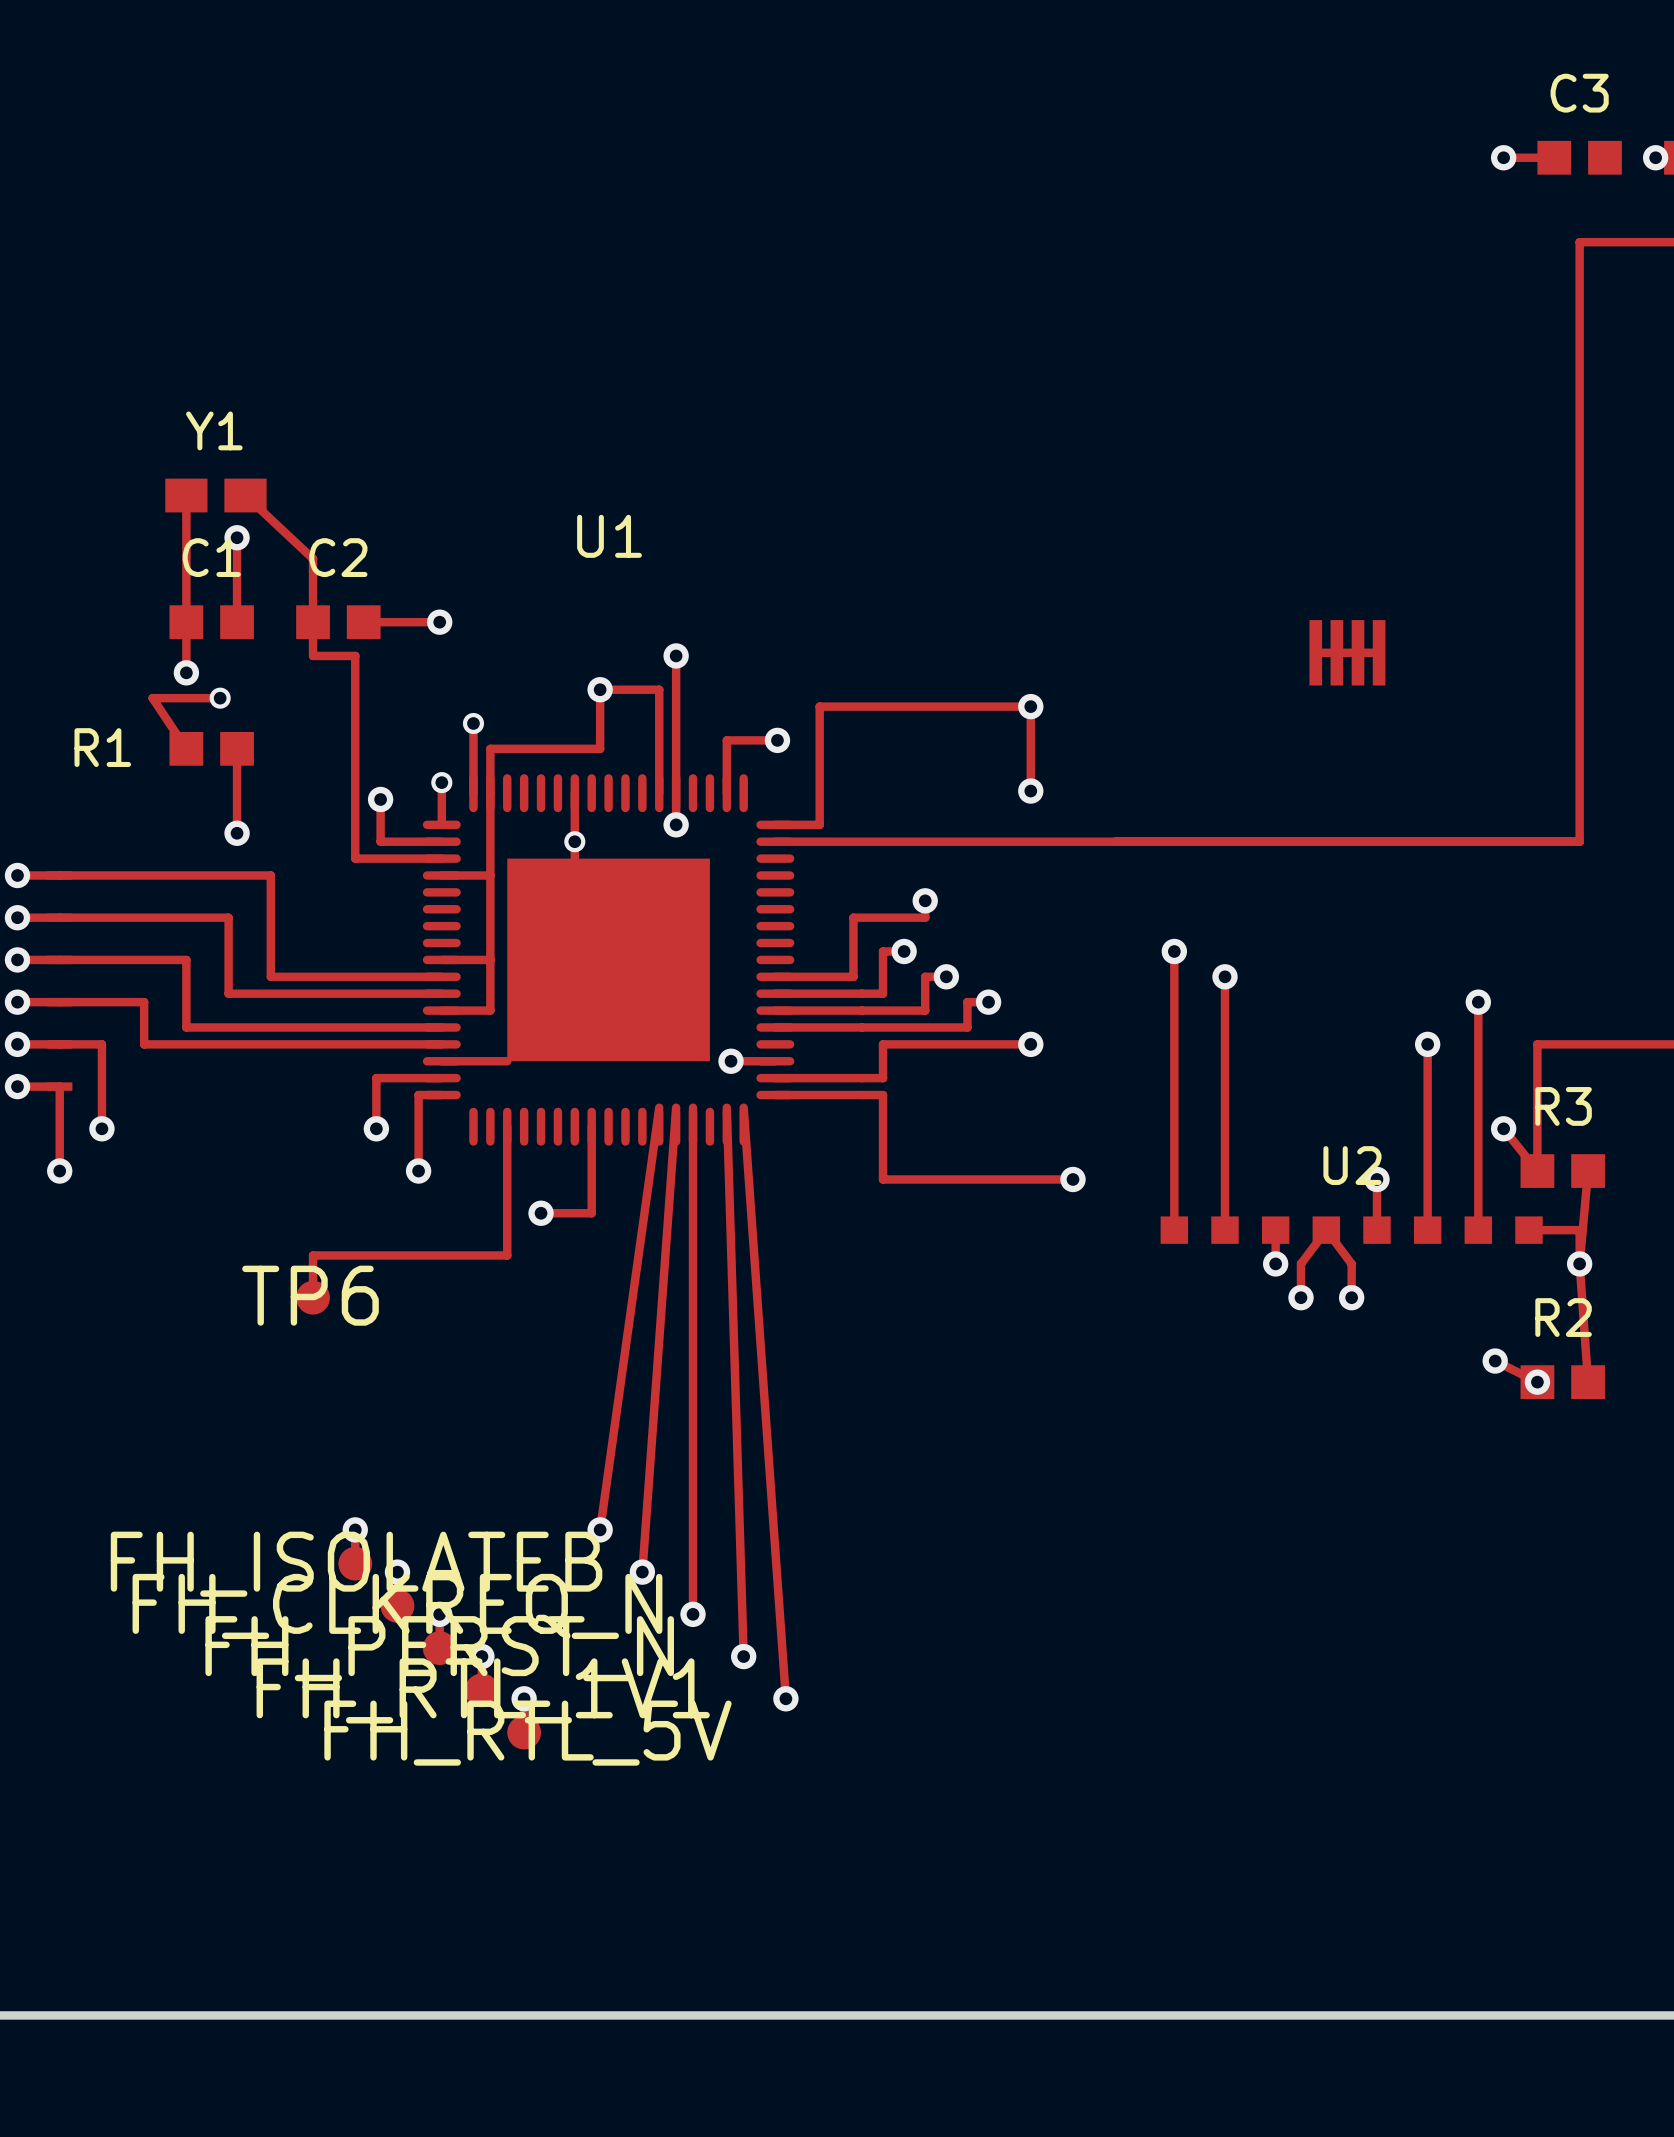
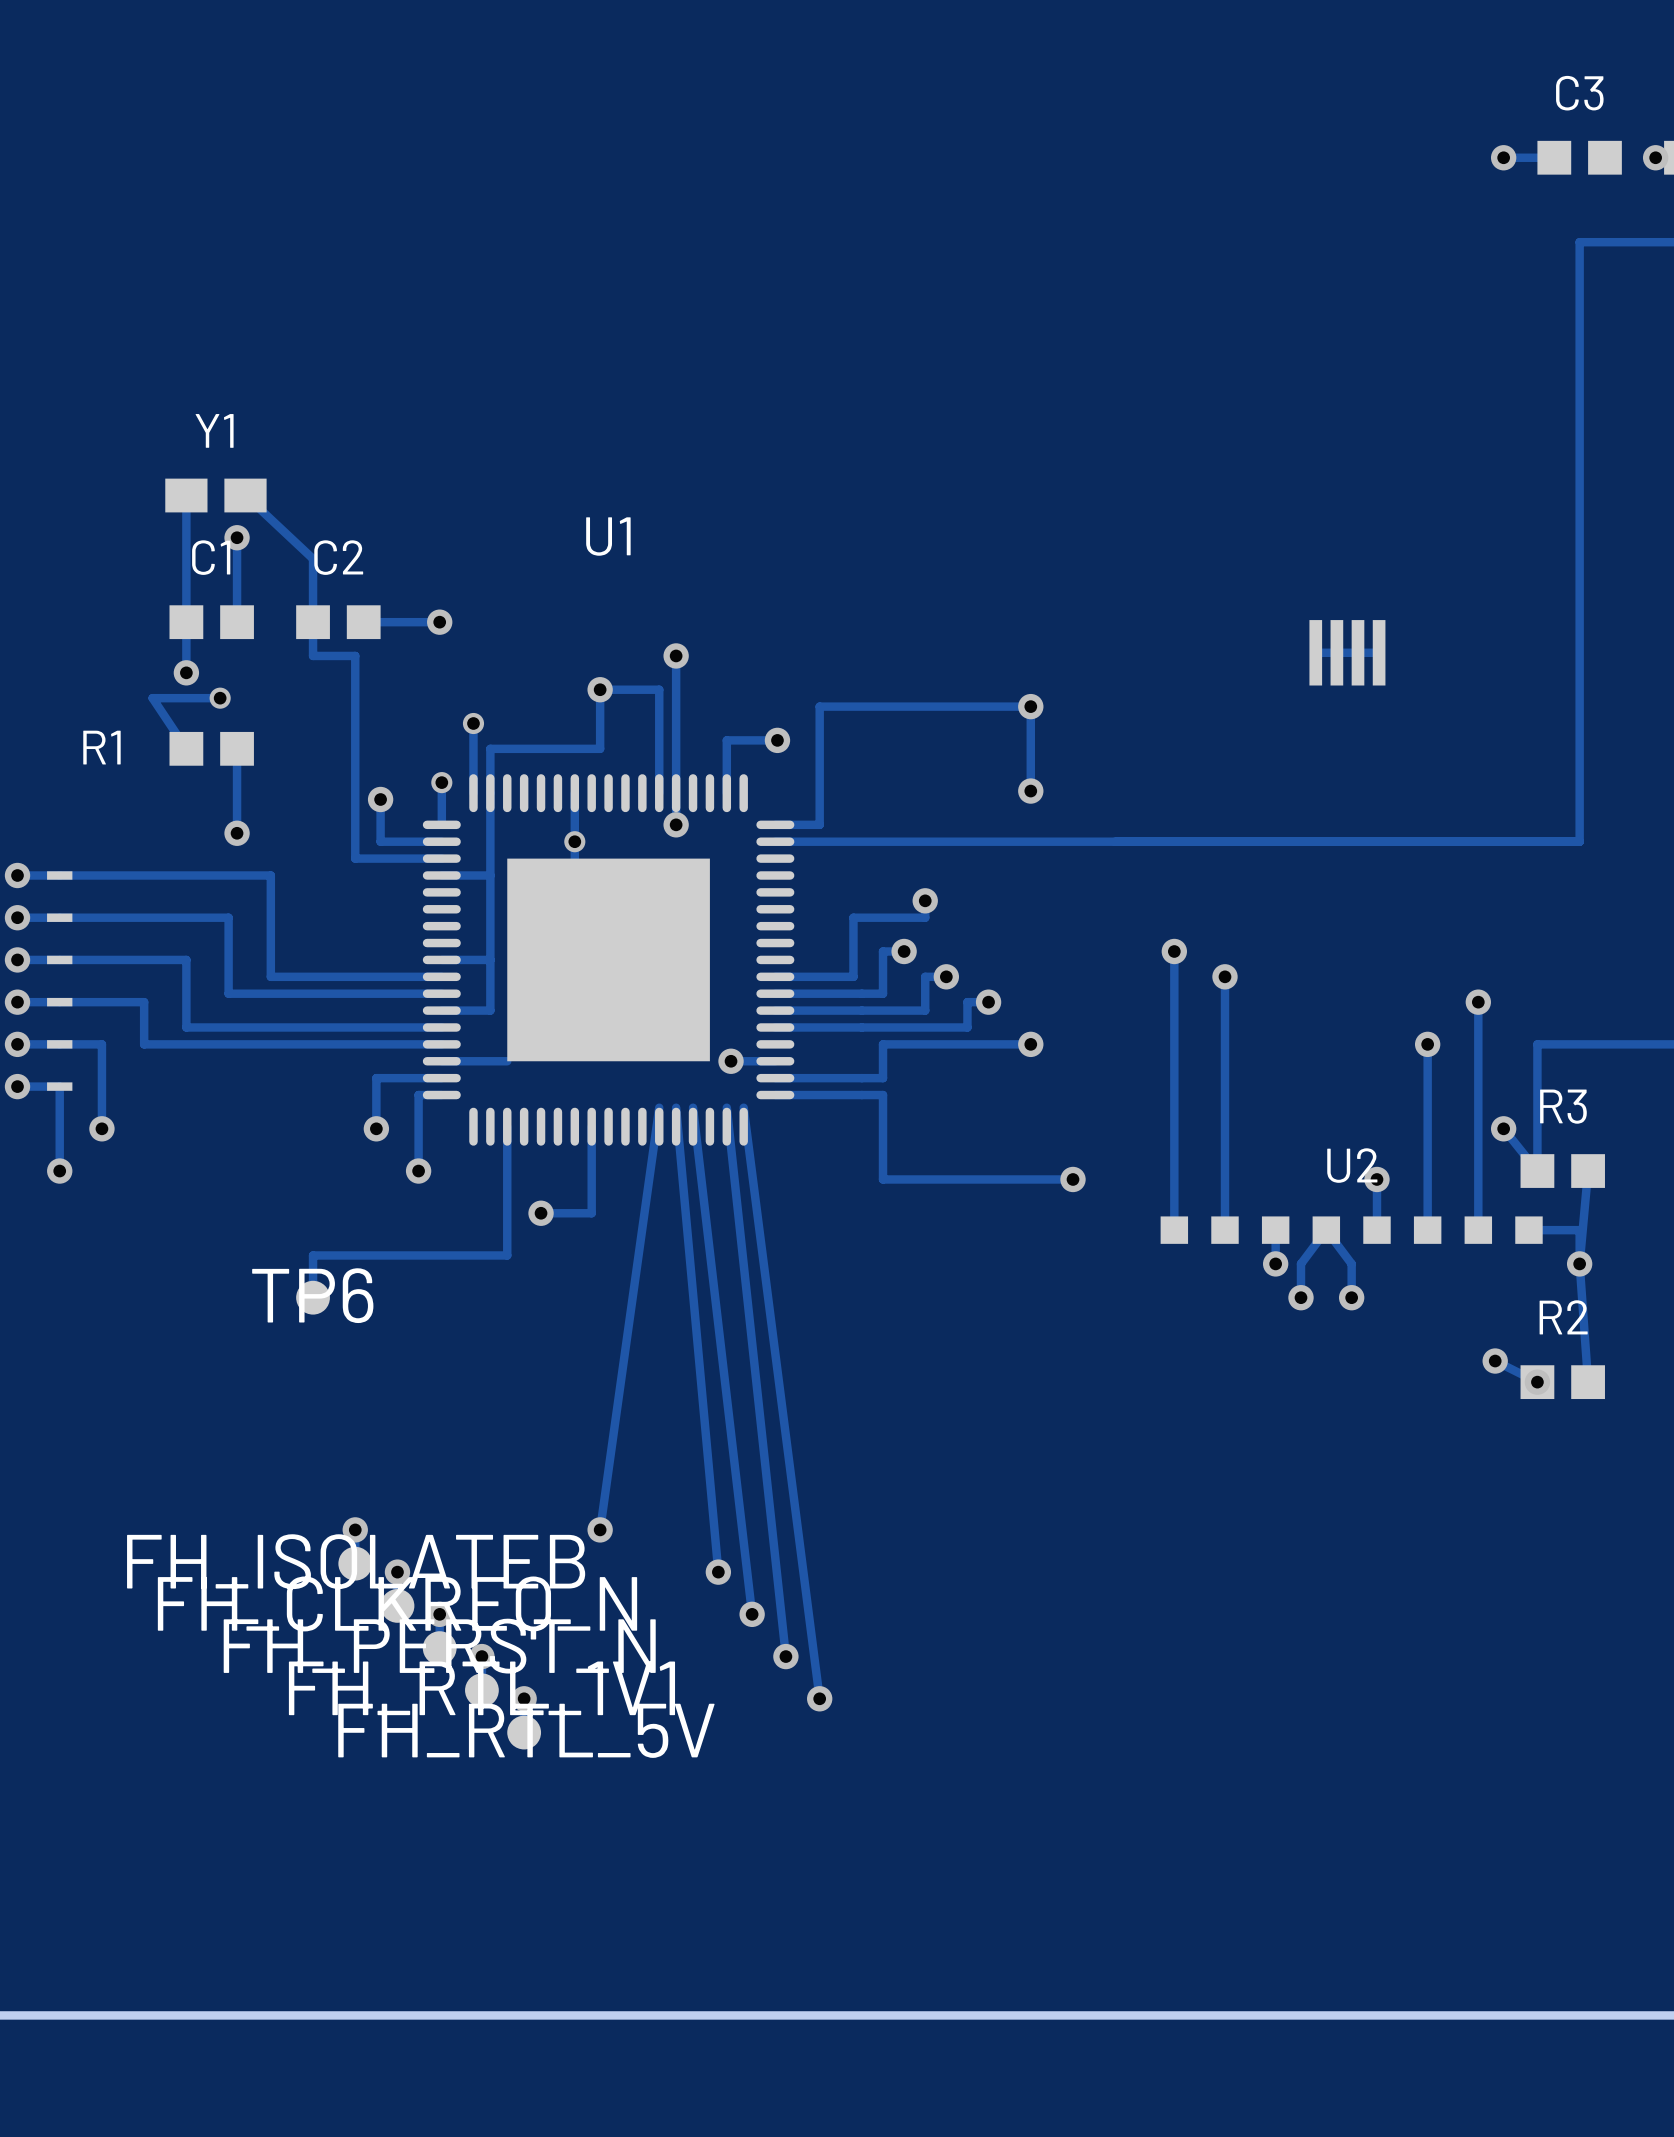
track: (676, 1107) (642, 1572) -> (676, 1107) (718, 1572)
track: (693, 1107) (693, 1614) -> (693, 1107) (752, 1614)
track: (726, 1107) (743, 1656) -> (726, 1107) (785, 1656)
track: (743, 1107) (785, 1698) -> (743, 1107) (819, 1698)
via: (642, 1572) -> none
via: none -> (718, 1572)
via: (693, 1614) -> none
via: none -> (752, 1614)
via: (743, 1656) -> none
via: none -> (785, 1656)
via: (785, 1698) -> none
via: none -> (819, 1698)

